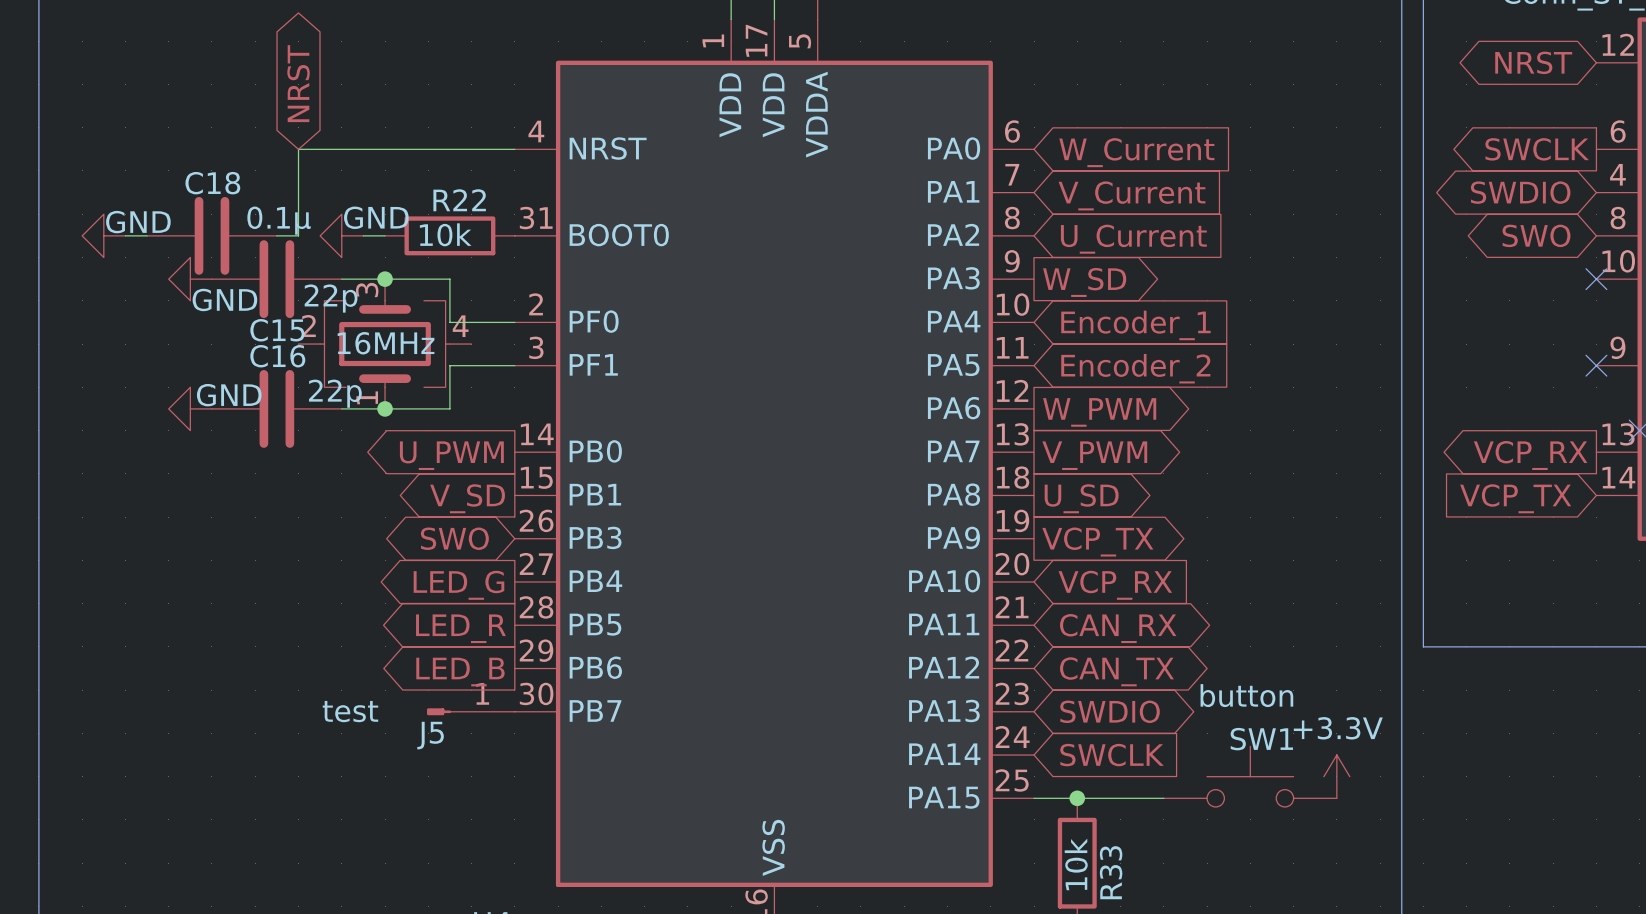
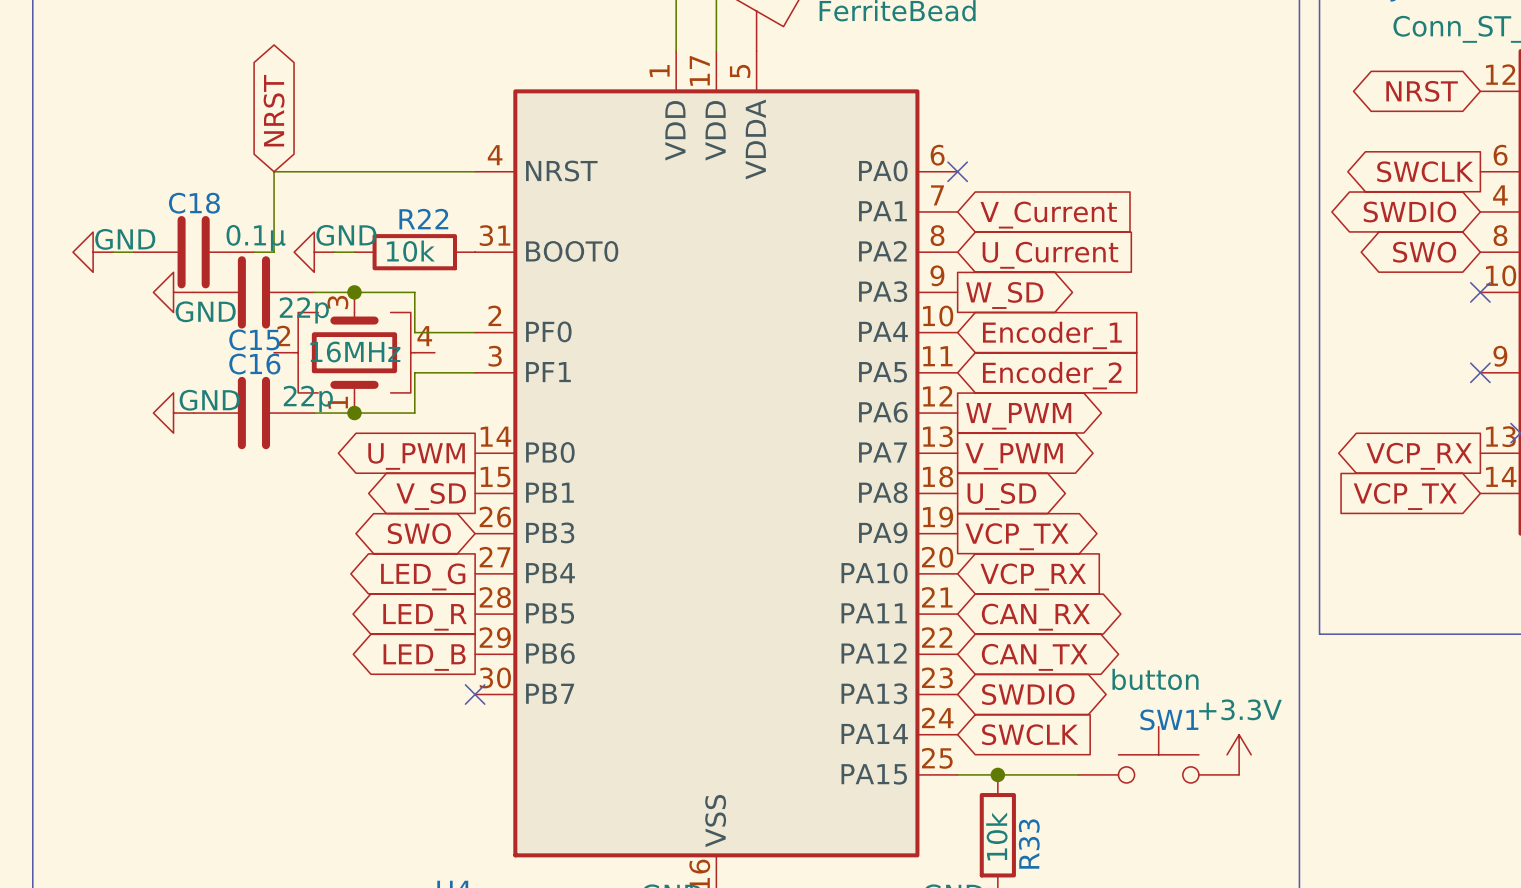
no-connect mark: none -> (957, 171)
global label: W_Current (1136, 152) -> none
J5: test (470, 711) -> none
no-connect mark: none -> (475, 694)

